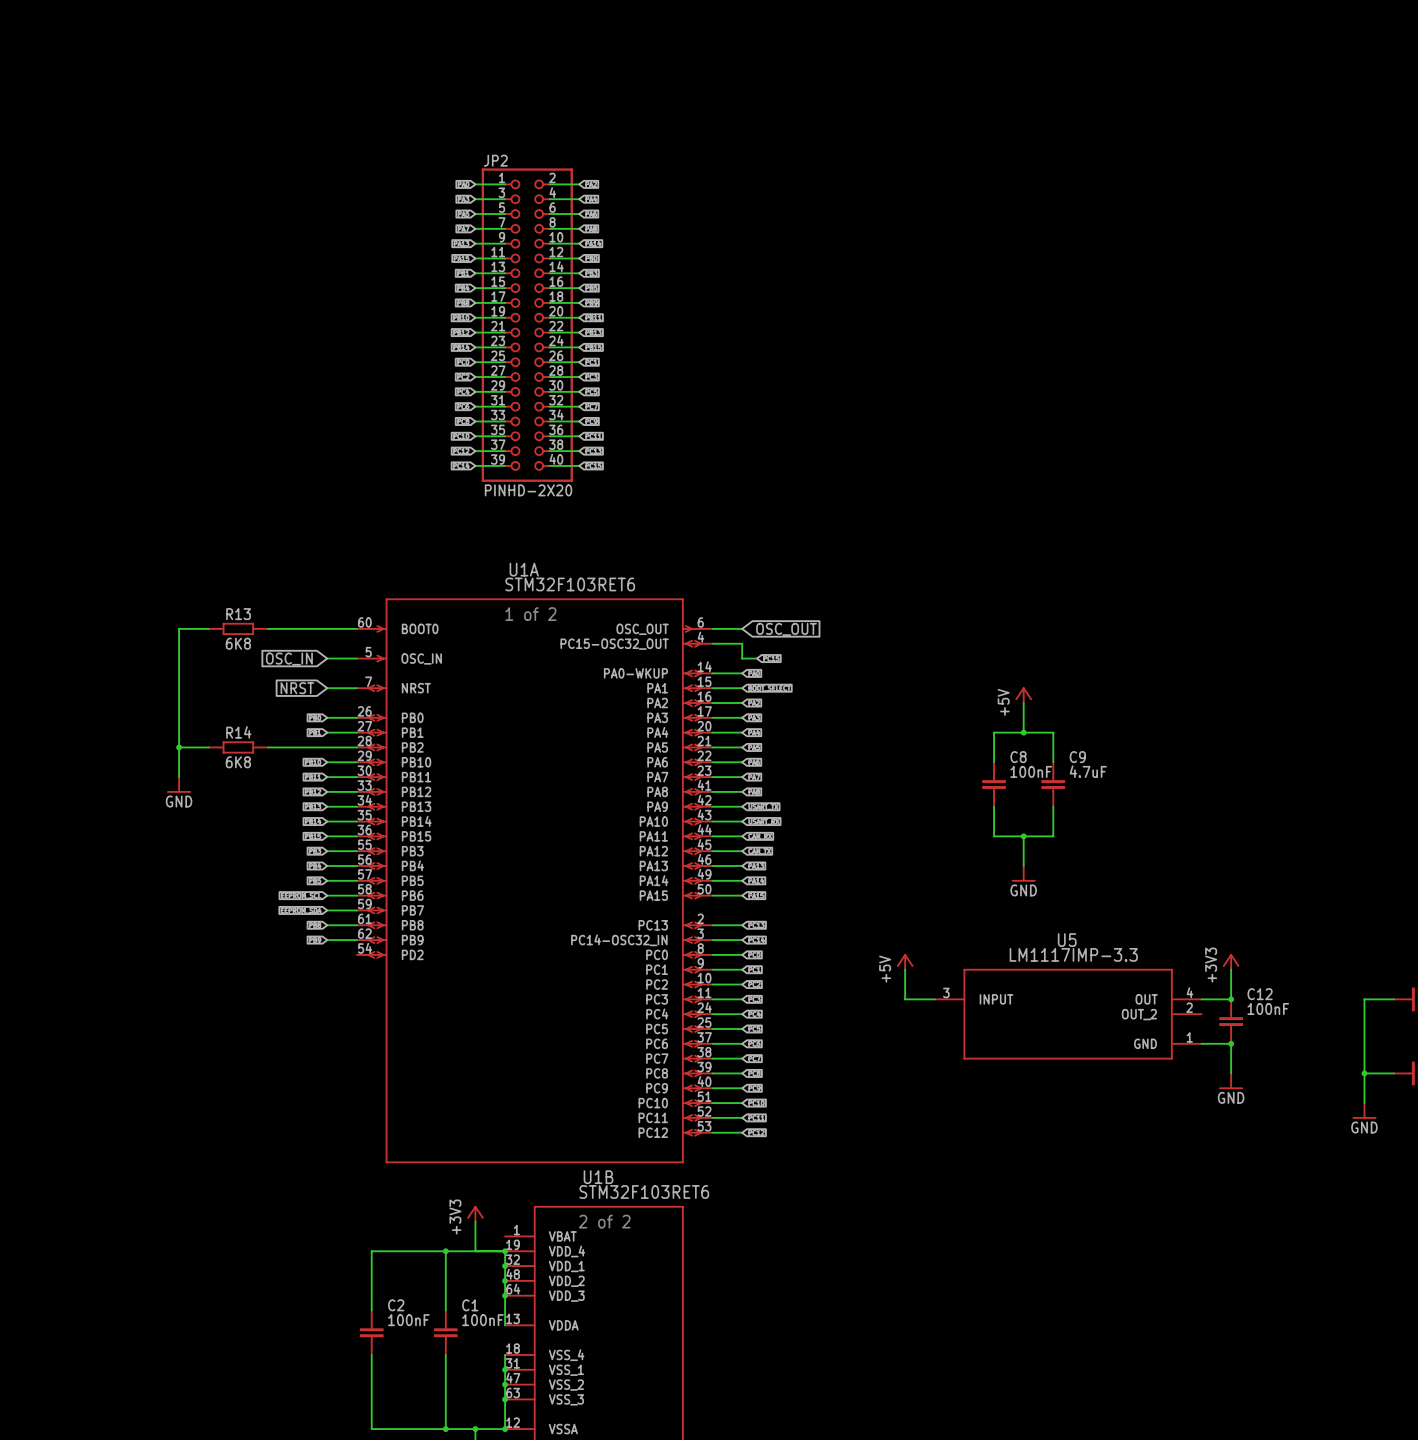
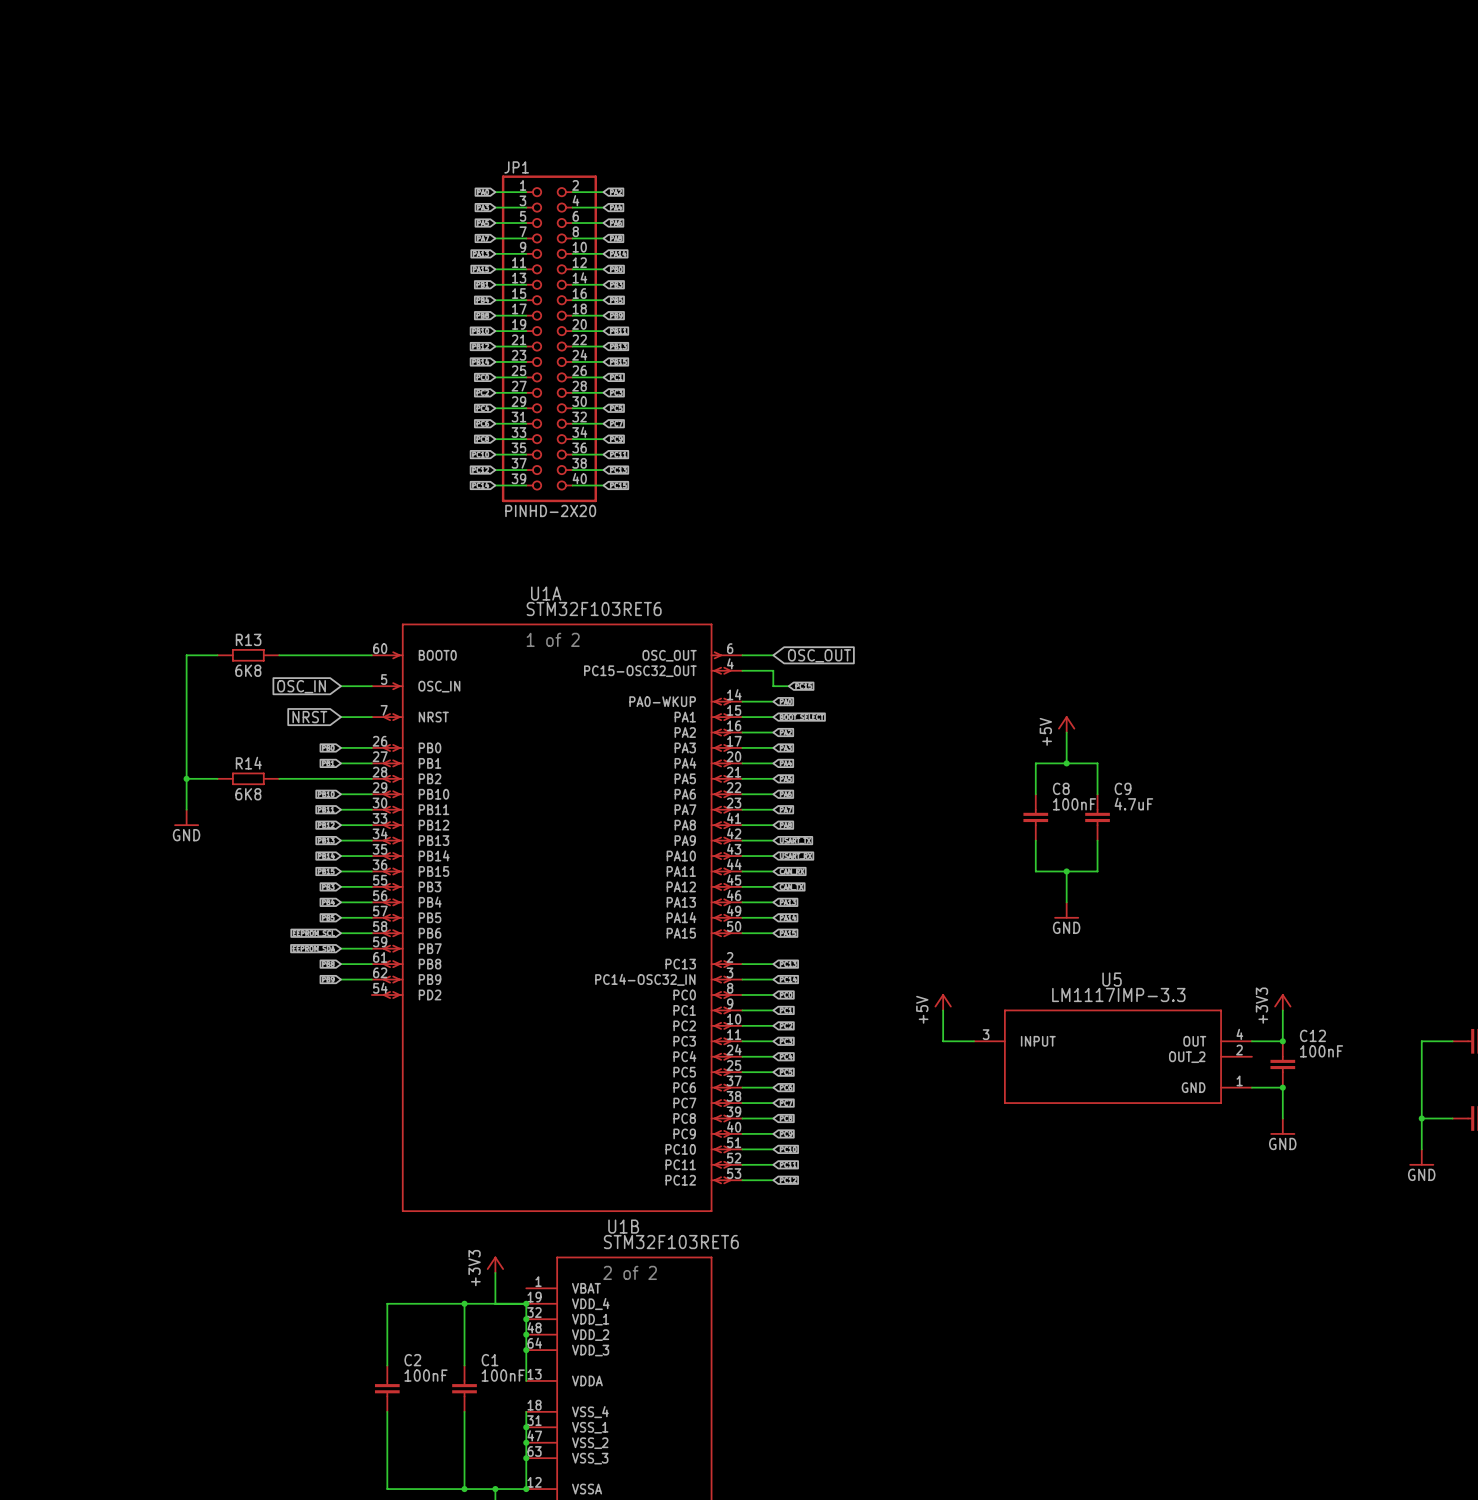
JP2 name: JP2 (495, 160) -> JP1 (516, 167)

